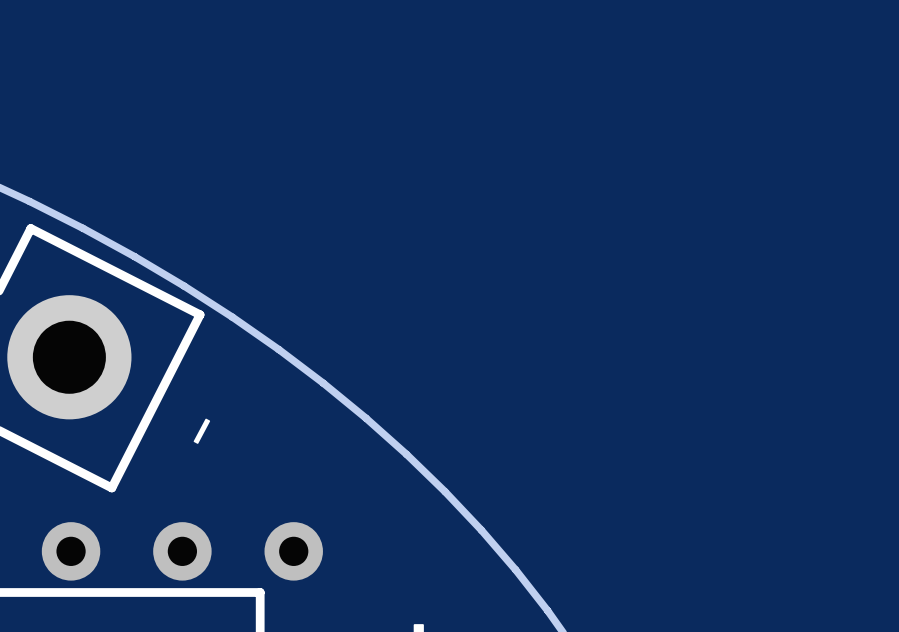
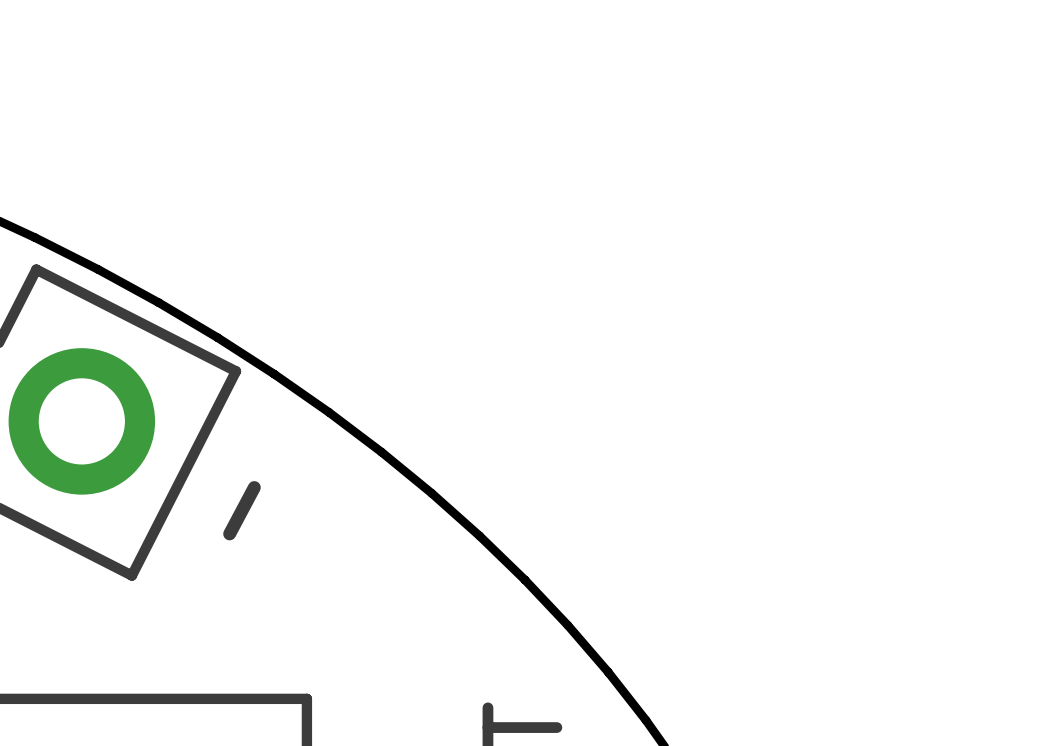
via: (71, 551) -> none
via: (182, 551) -> none
via: (293, 551) -> none

